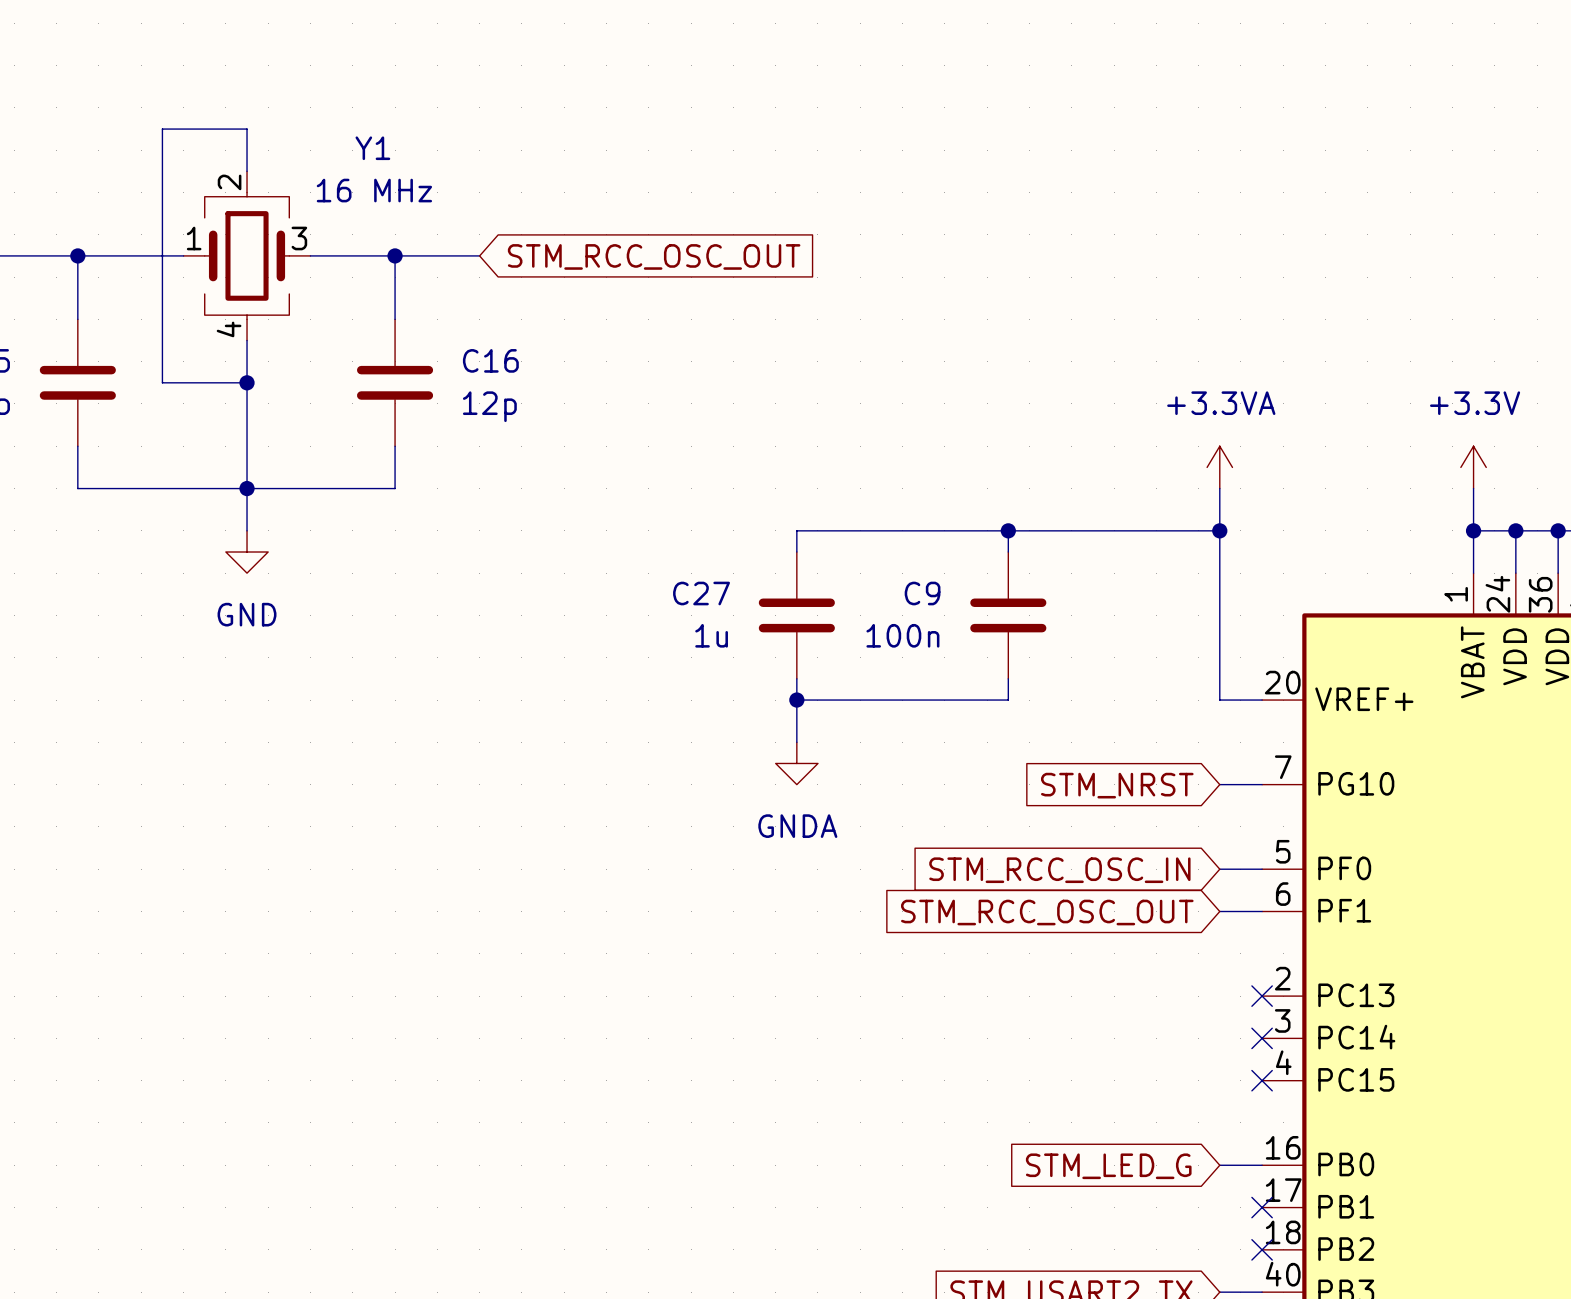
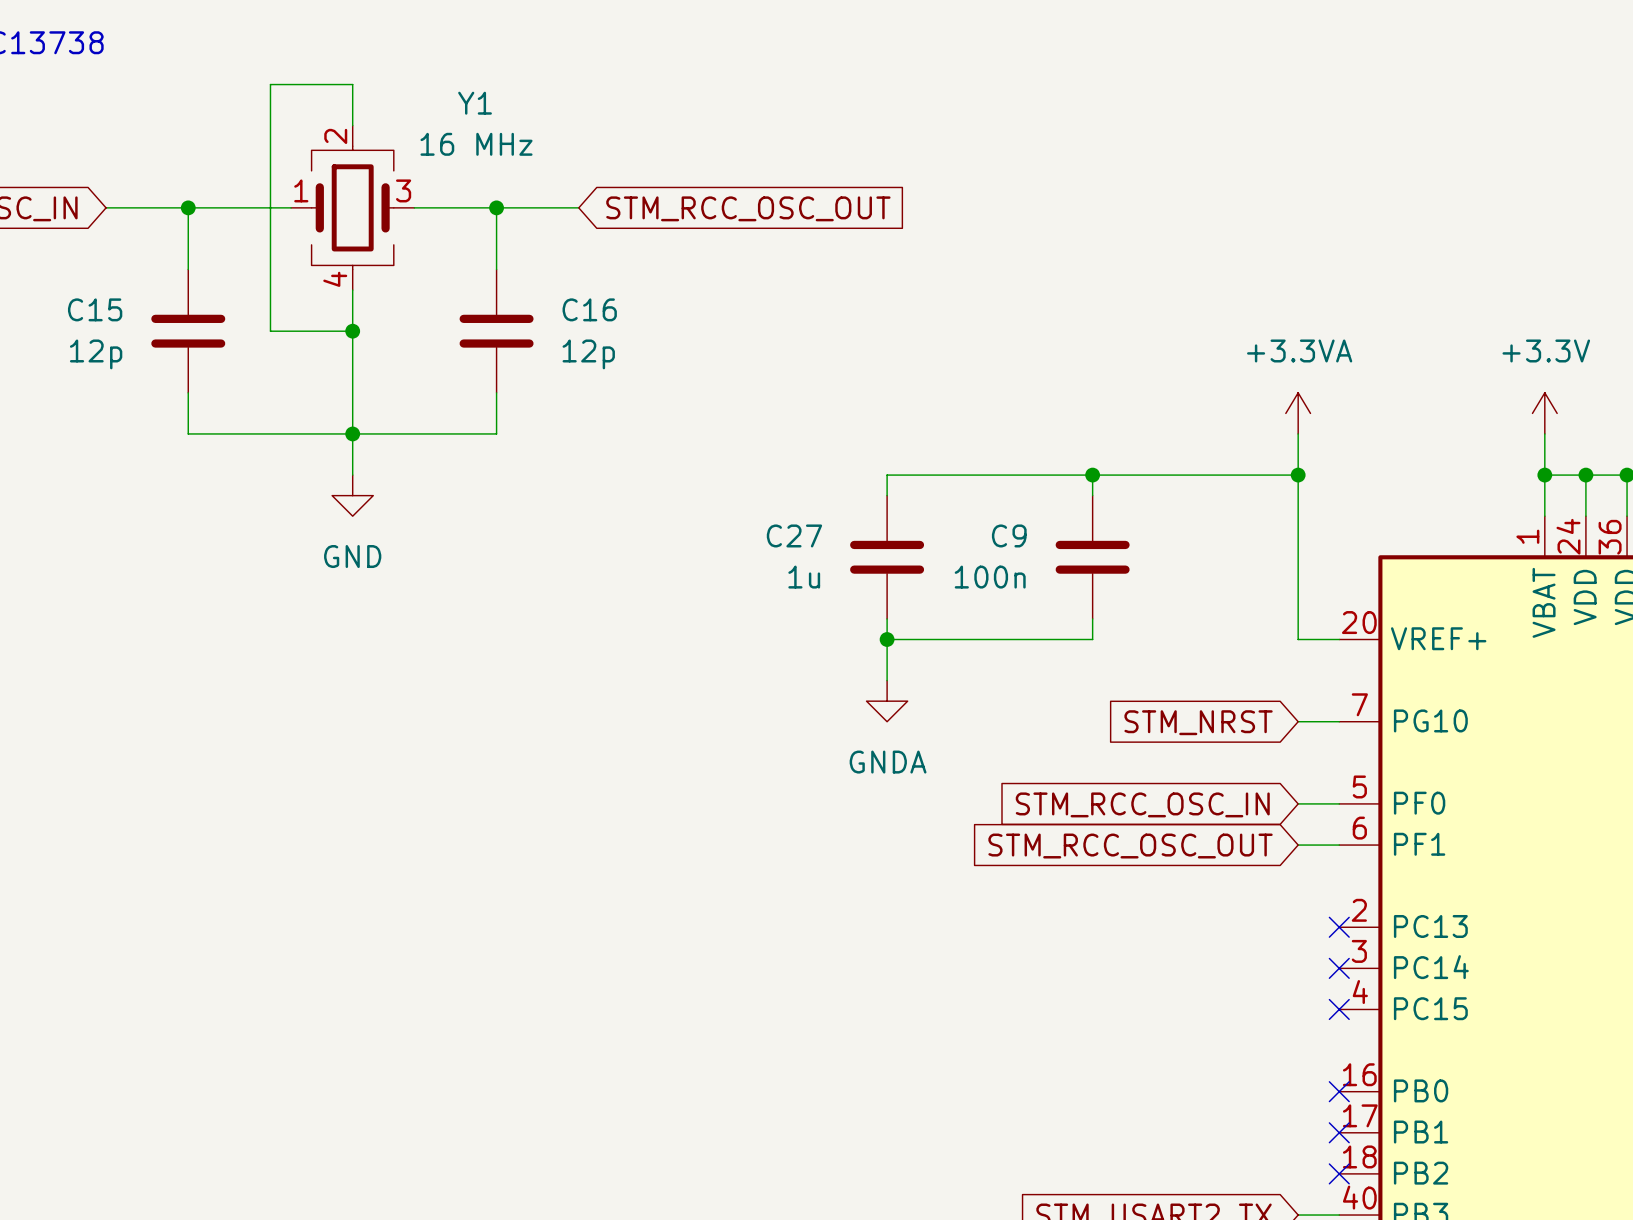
wire: (1219, 1165) (1262, 1165) -> none
no-connect mark: none -> (1339, 1091)
global label: STM_LED_G (1108, 1166) -> none

